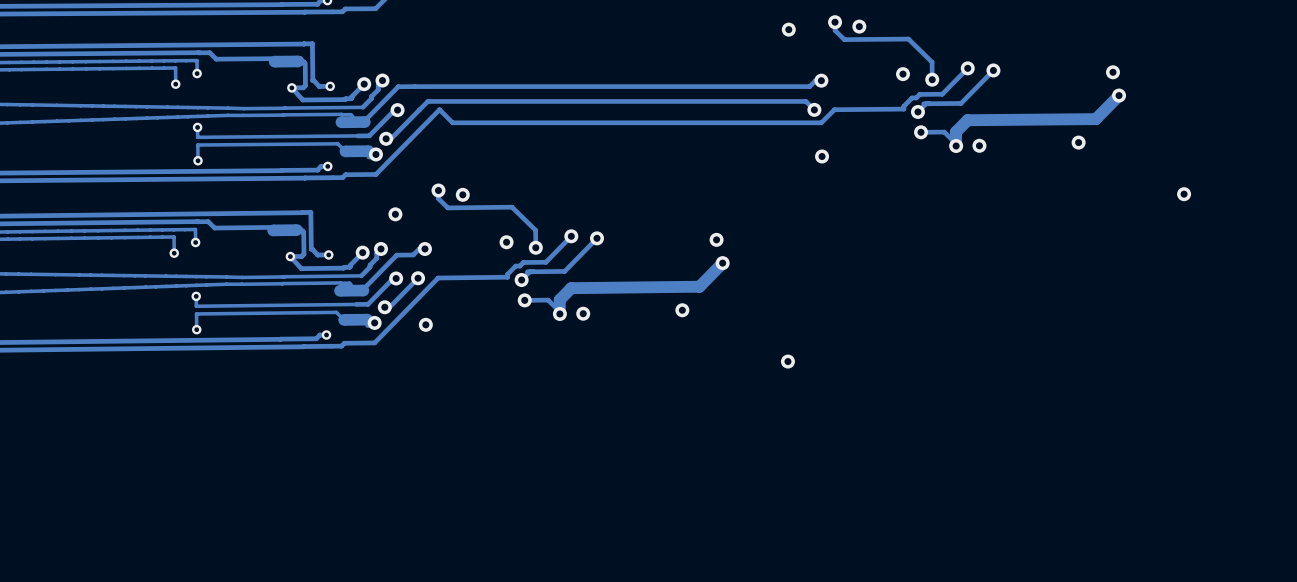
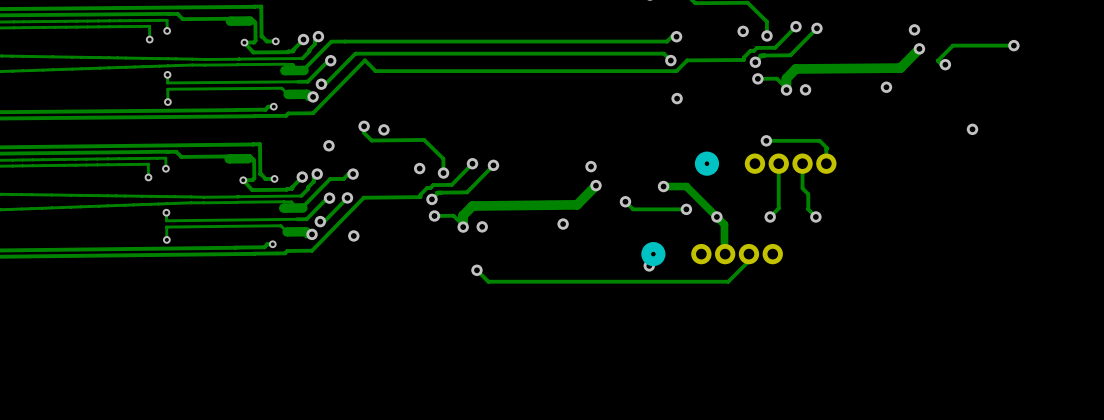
track: none -> (1013, 45) (952, 45) (937, 60) (941, 64) (945, 64)
via: none -> (1013, 45)
via: none -> (945, 64)
track: none -> (766, 140) (819, 140) (827, 148) (826, 163)
via: none -> (766, 140)
part: none -> (765, 163)
track: none -> (778, 163) (778, 208) (770, 216)
track: none -> (802, 163) (802, 188) (808, 194) (808, 209) (815, 216)
track: none -> (663, 186) (686, 186) (724, 224) (724, 247)
via: none -> (663, 186)
track: none -> (625, 201) (633, 209) (686, 209)
via: none -> (625, 201)
via: none -> (686, 209)
via: none -> (716, 216)
via: none -> (770, 216)
via: none -> (815, 216)
track: none -> (748, 247) (748, 261) (728, 281) (488, 281) (476, 270)
part: none -> (712, 254)
via: none -> (476, 270)

